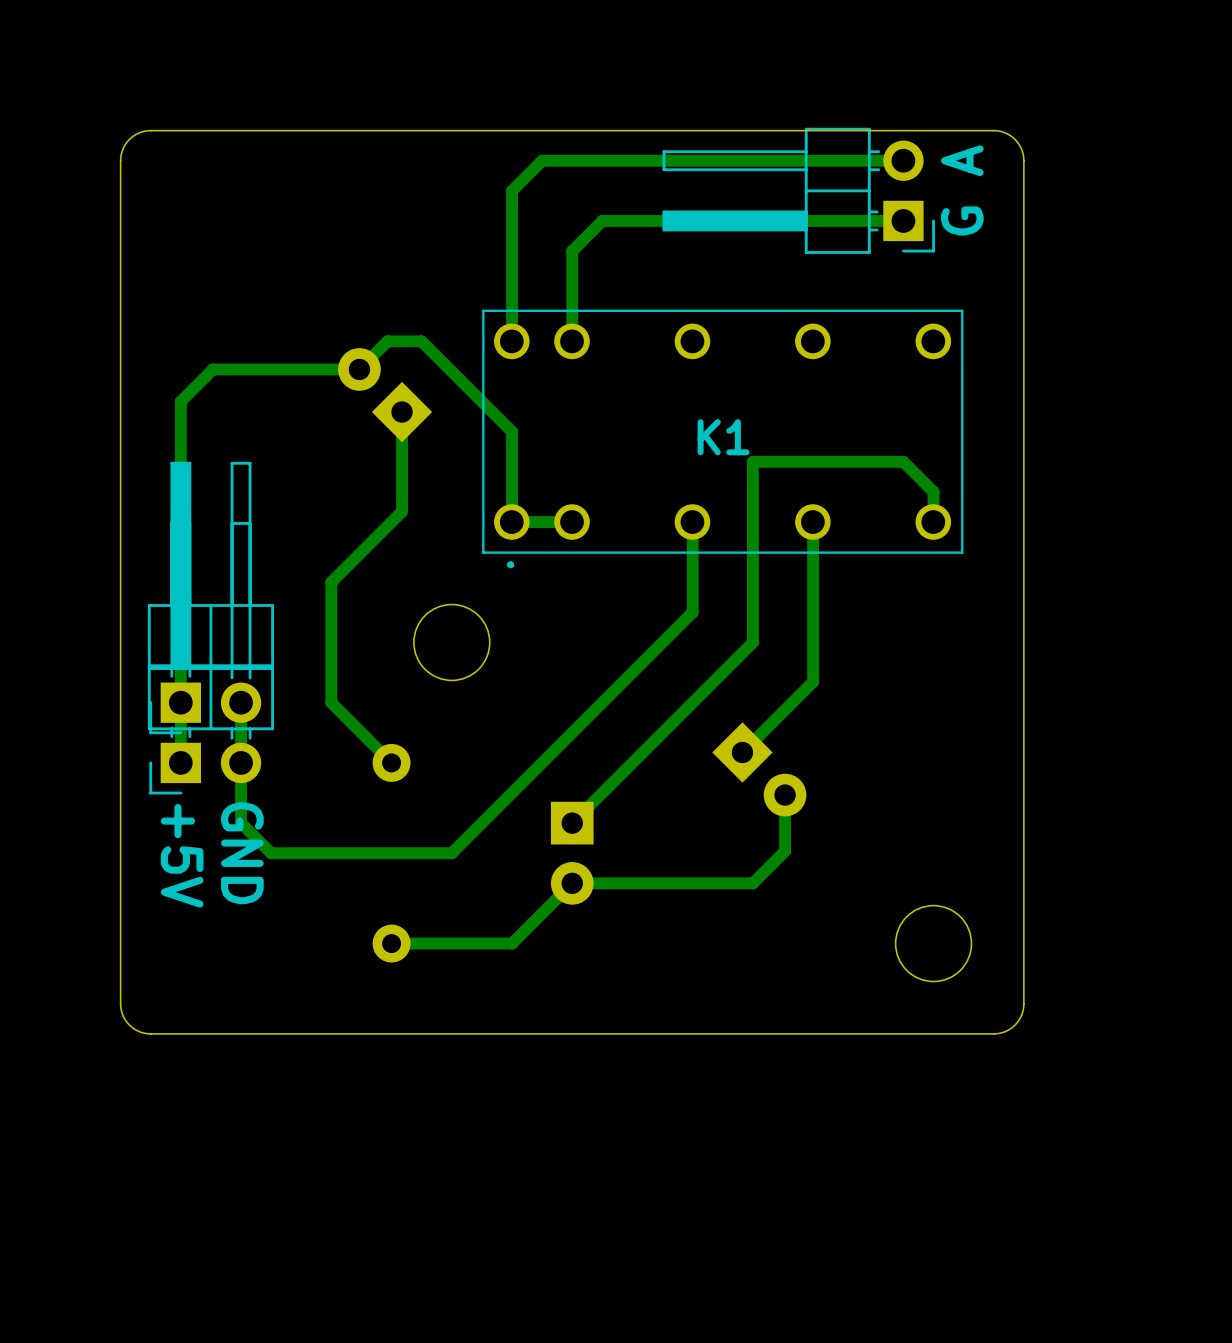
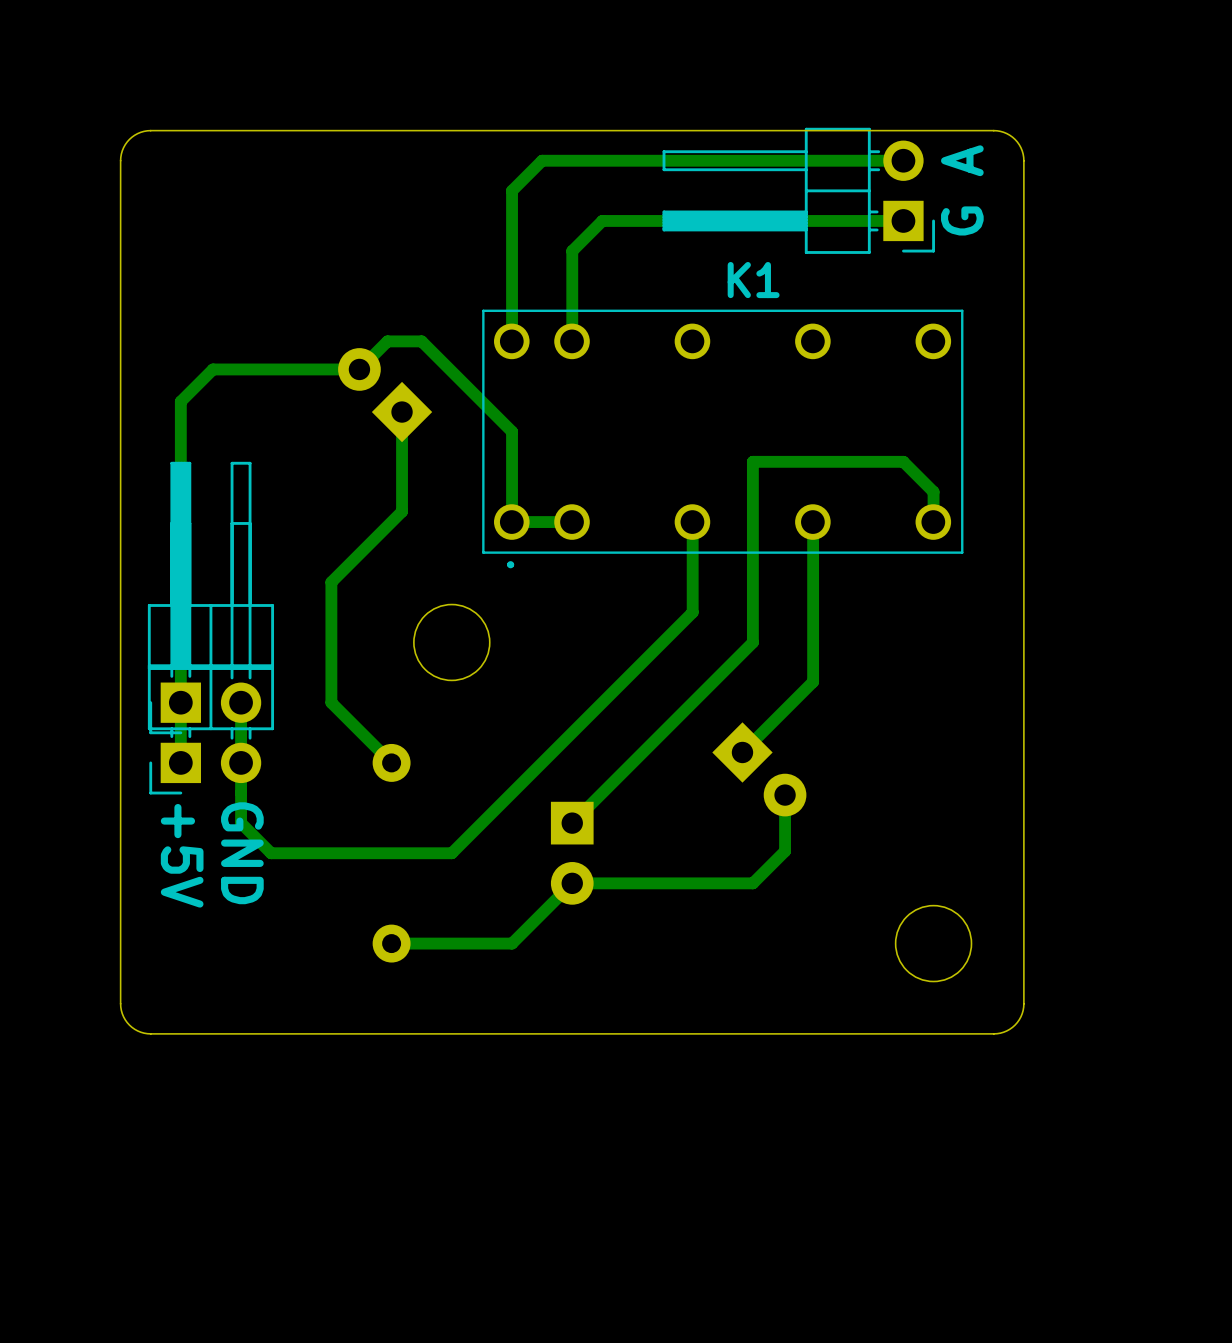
K1 name position: K1 (723, 437) -> K1 (753, 280)

